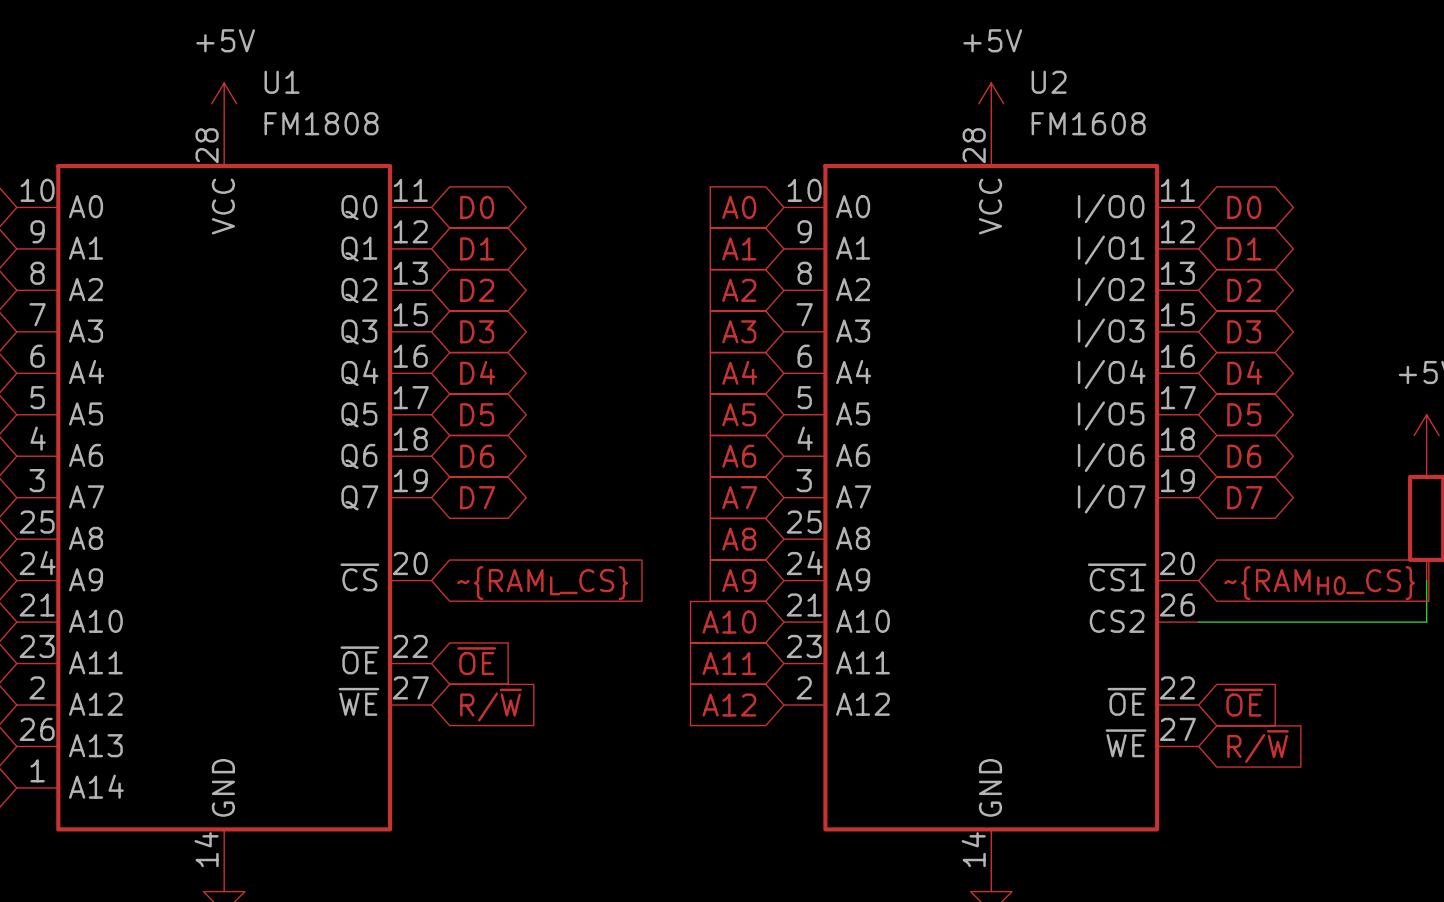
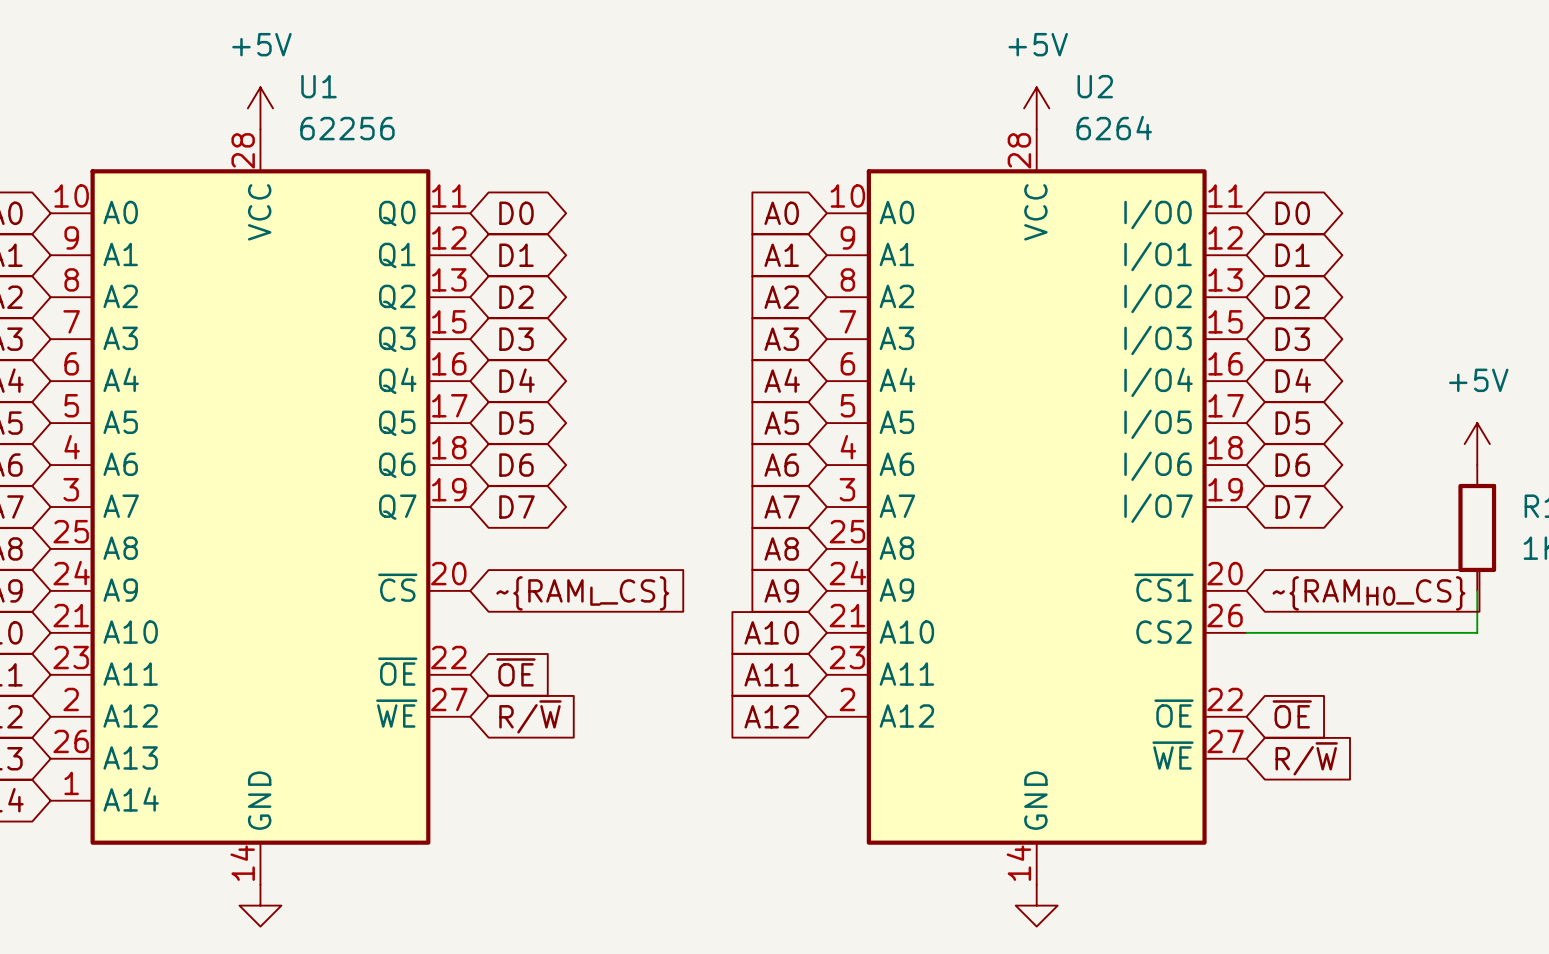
U1 value: FM1808 (321, 123) -> 62256 (347, 128)
U2 value: FM1608 (1088, 123) -> 6264 (1114, 128)

